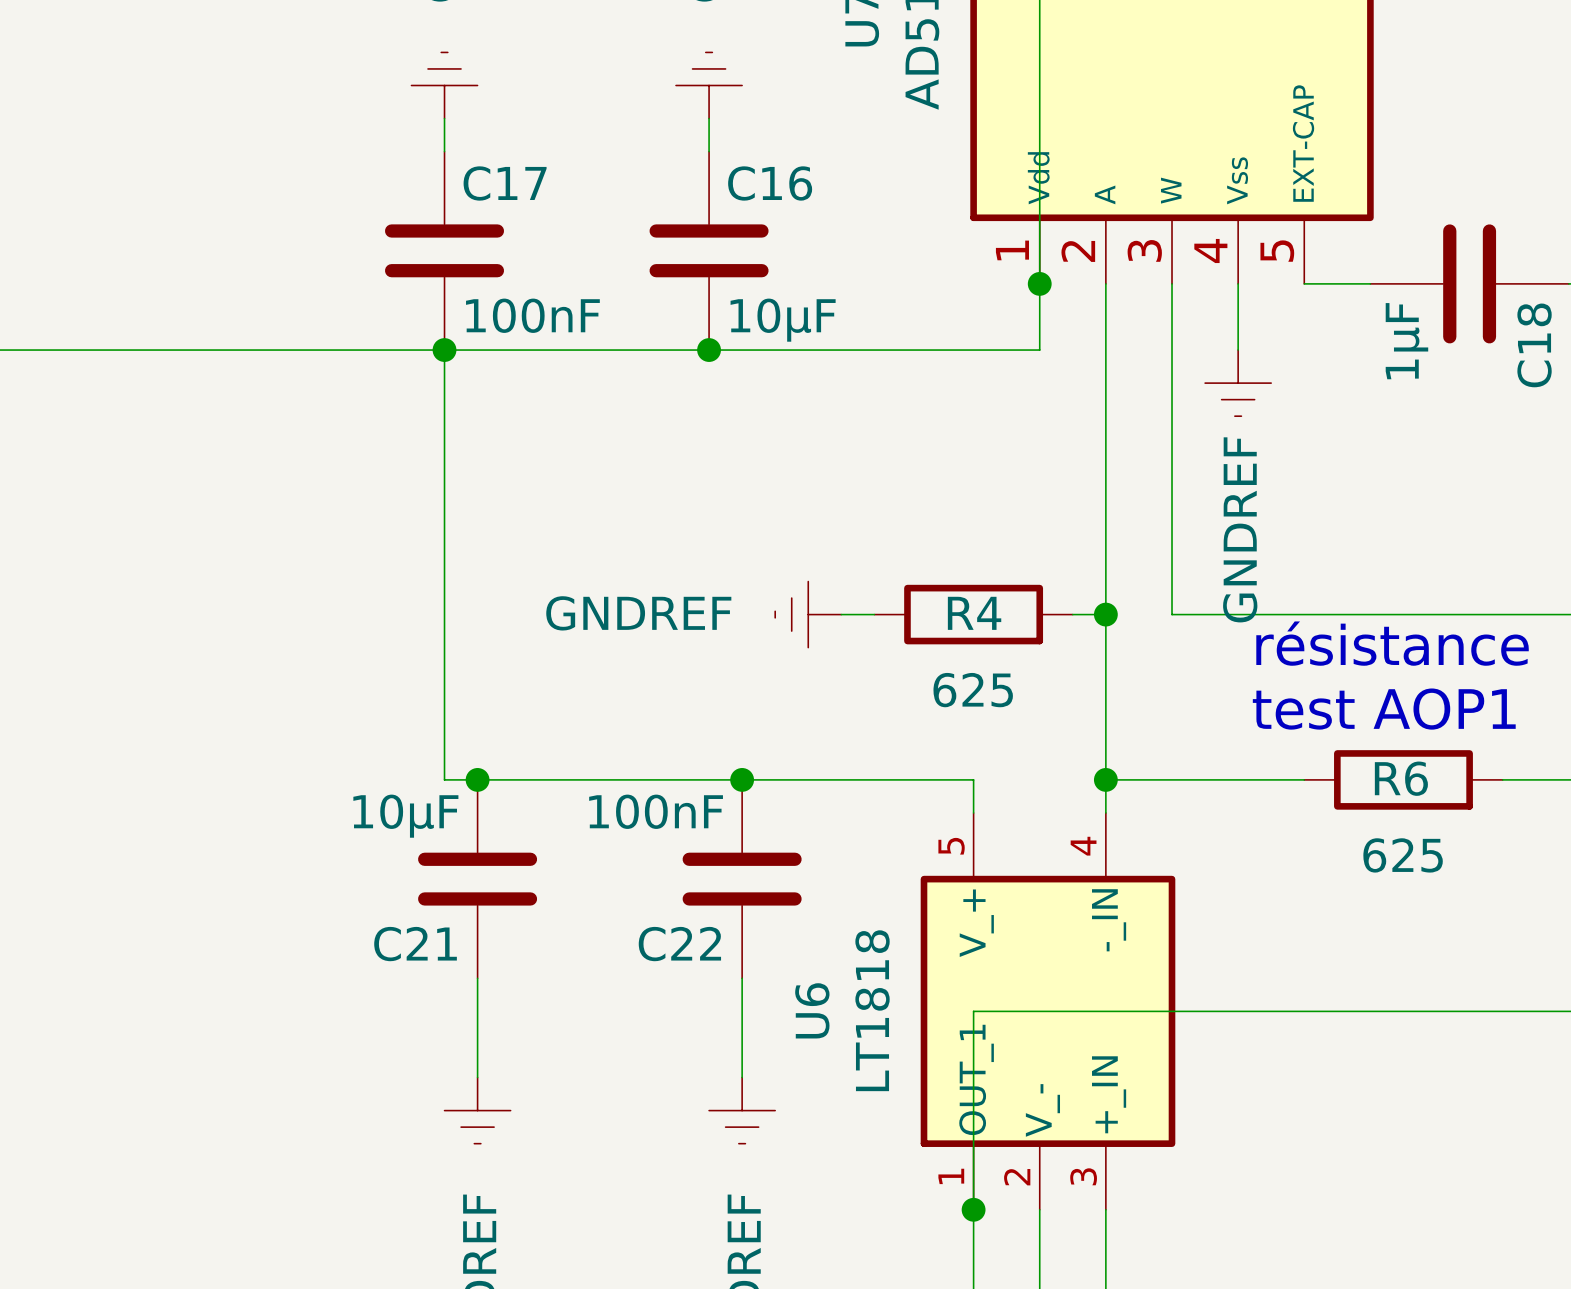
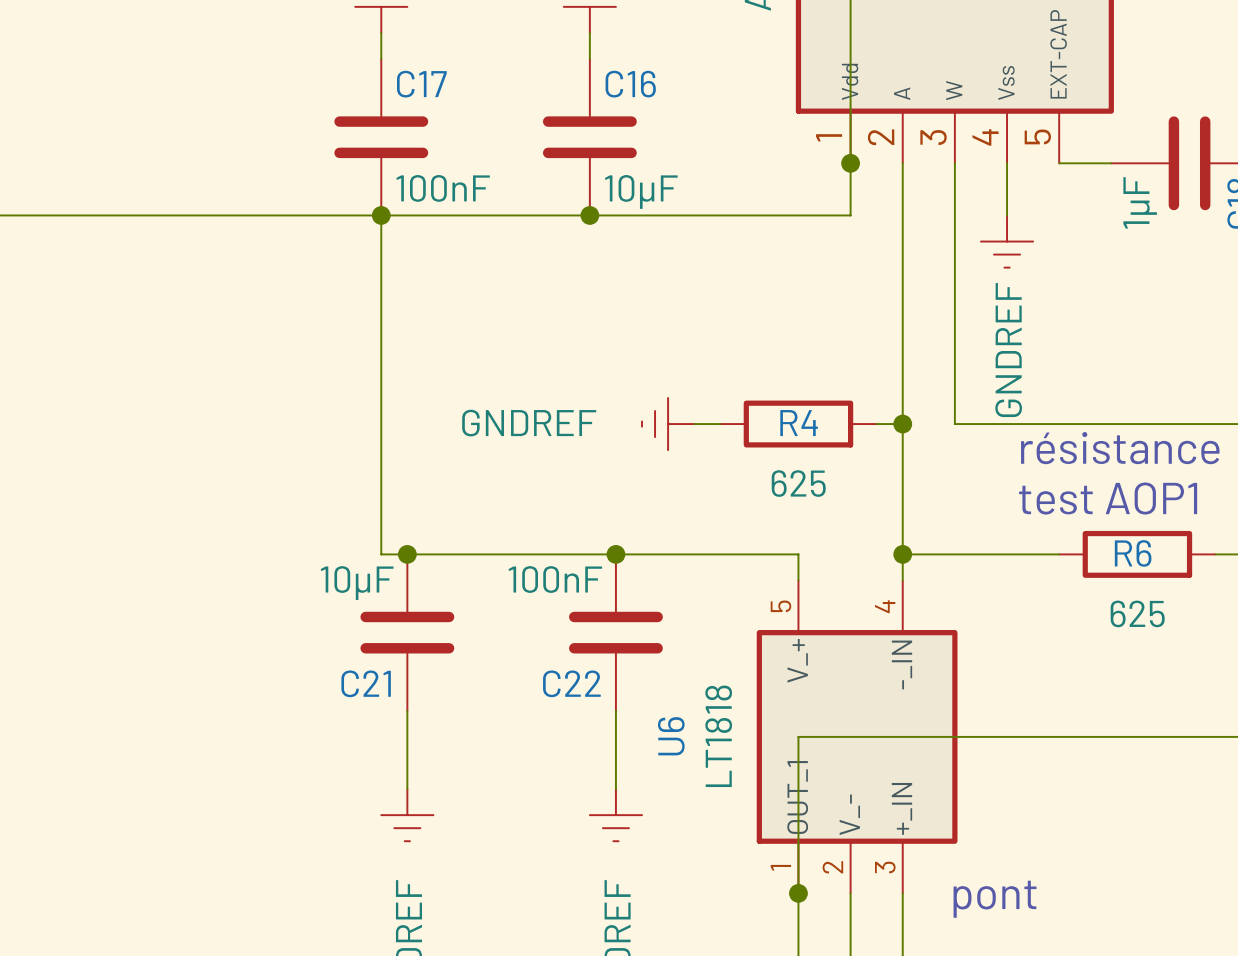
text: none -> pont (995, 899)

